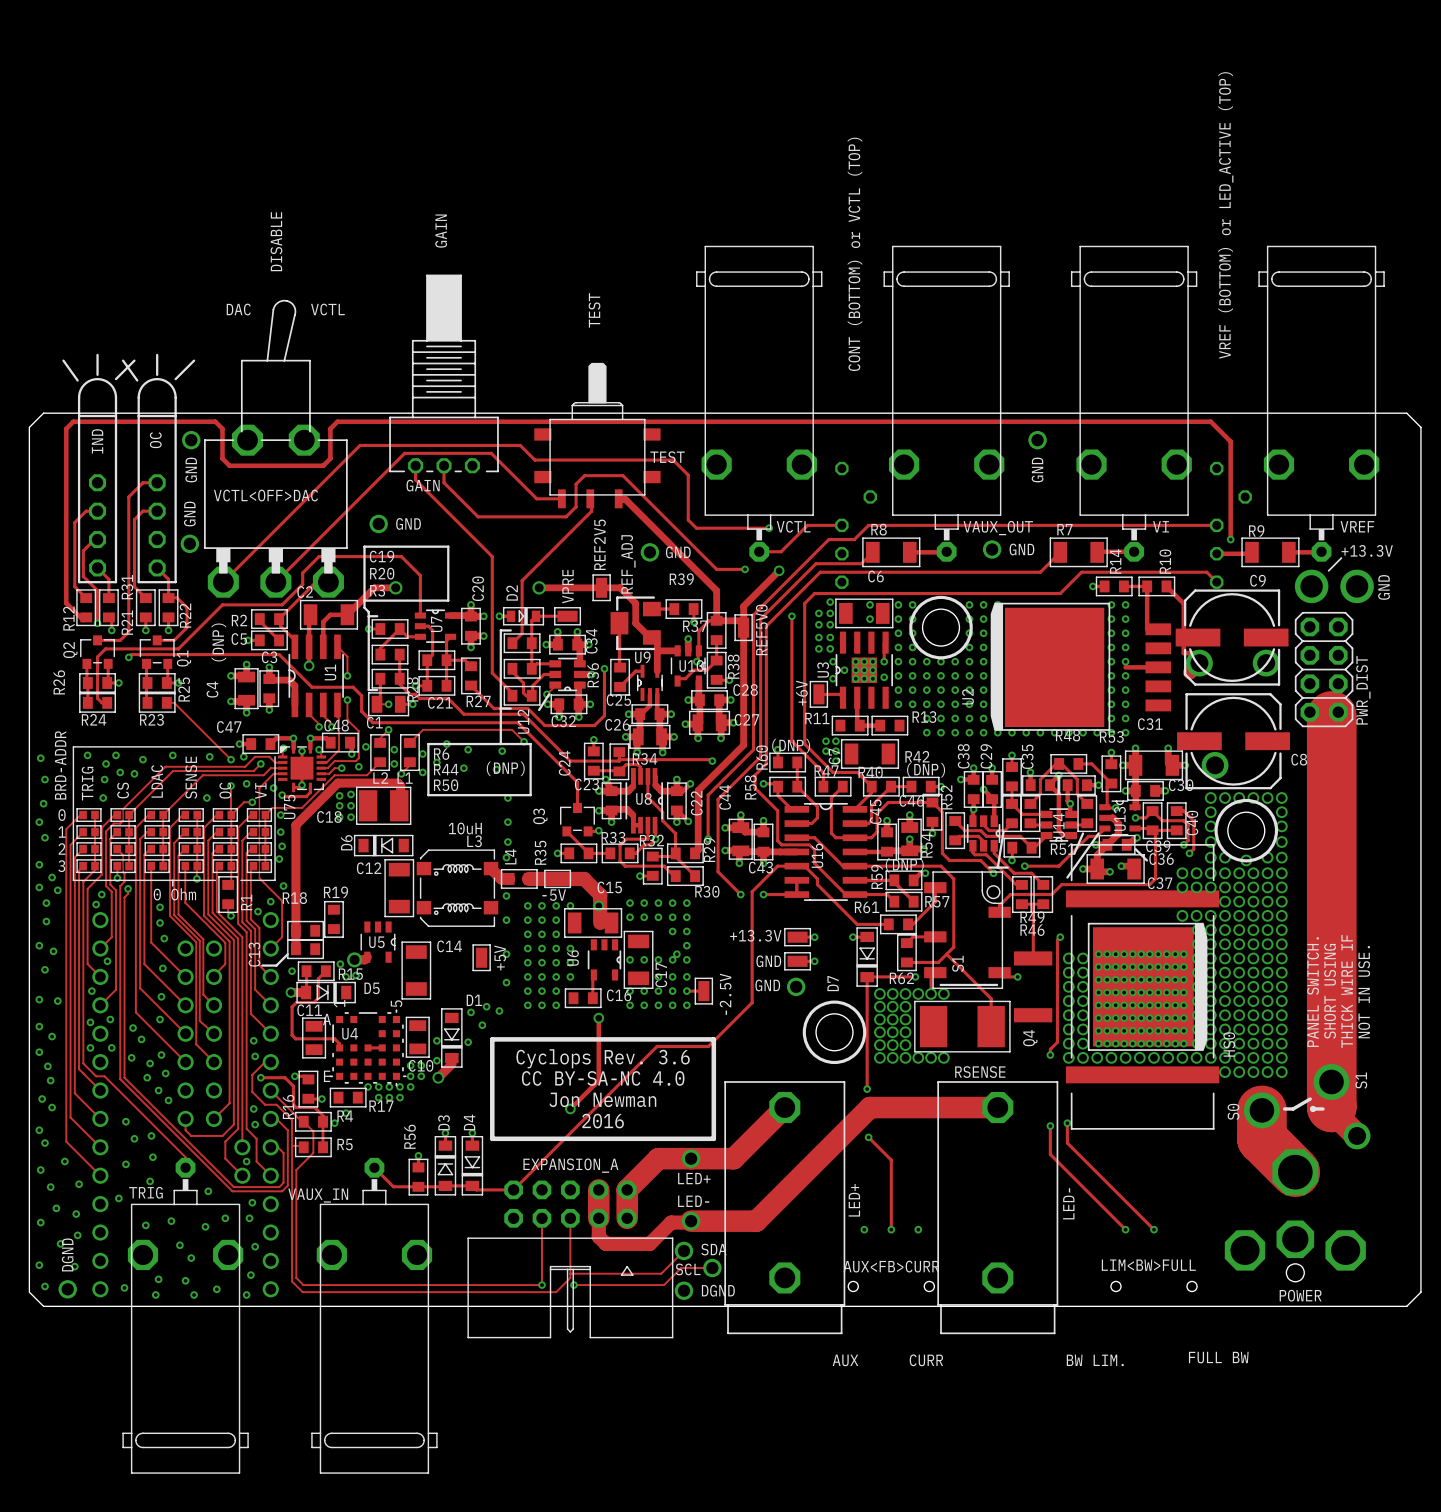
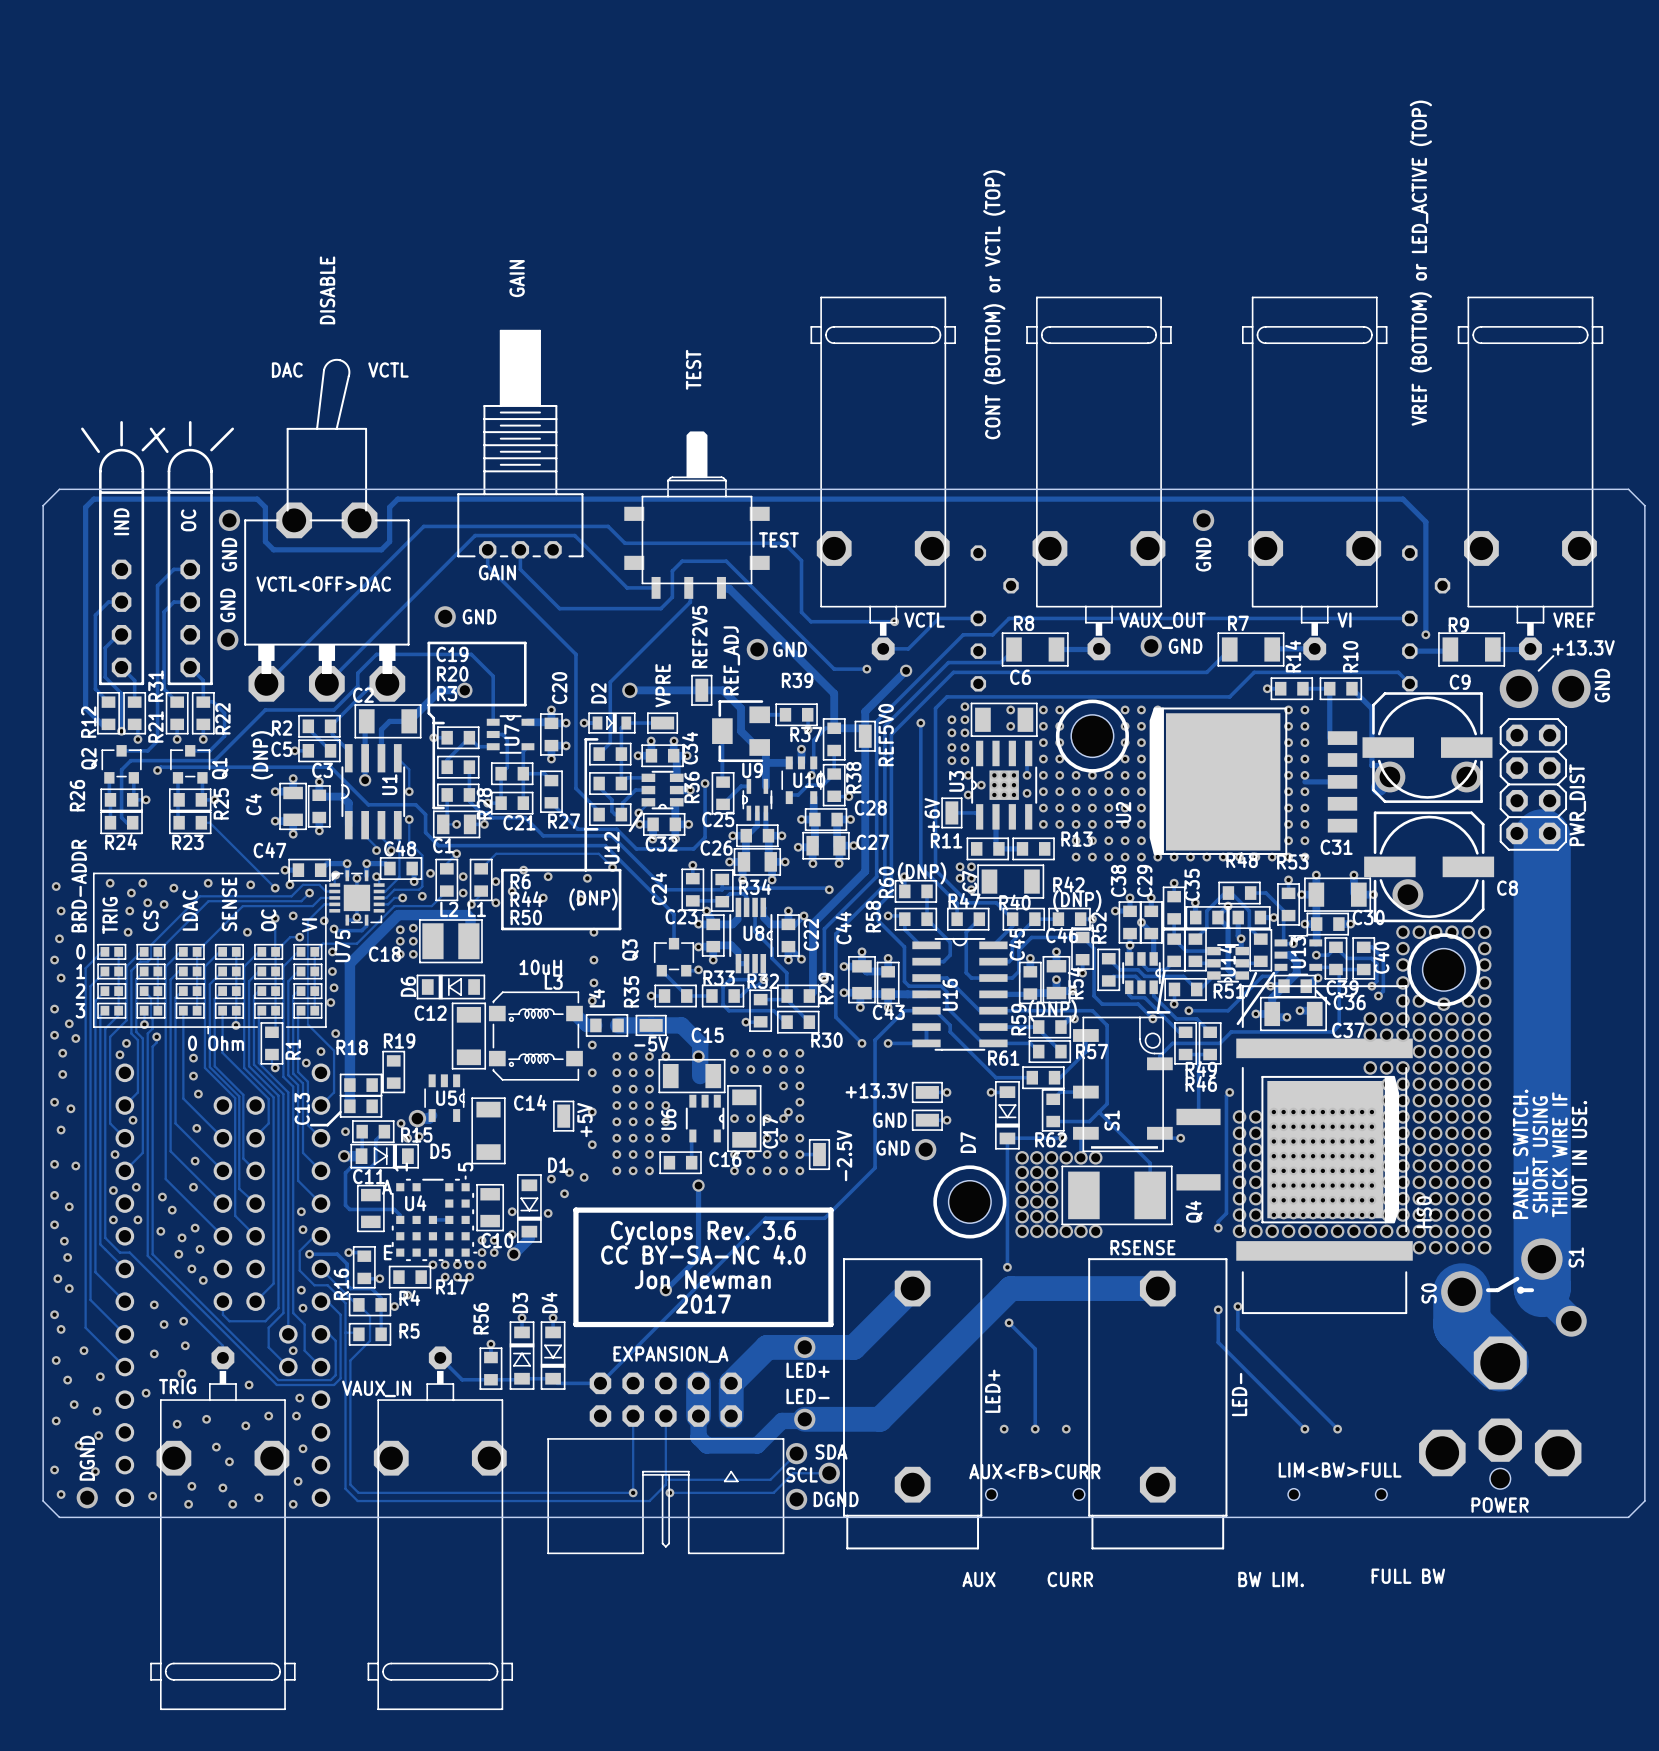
text: 2016 (603, 1121) -> 2017 (703, 1304)

